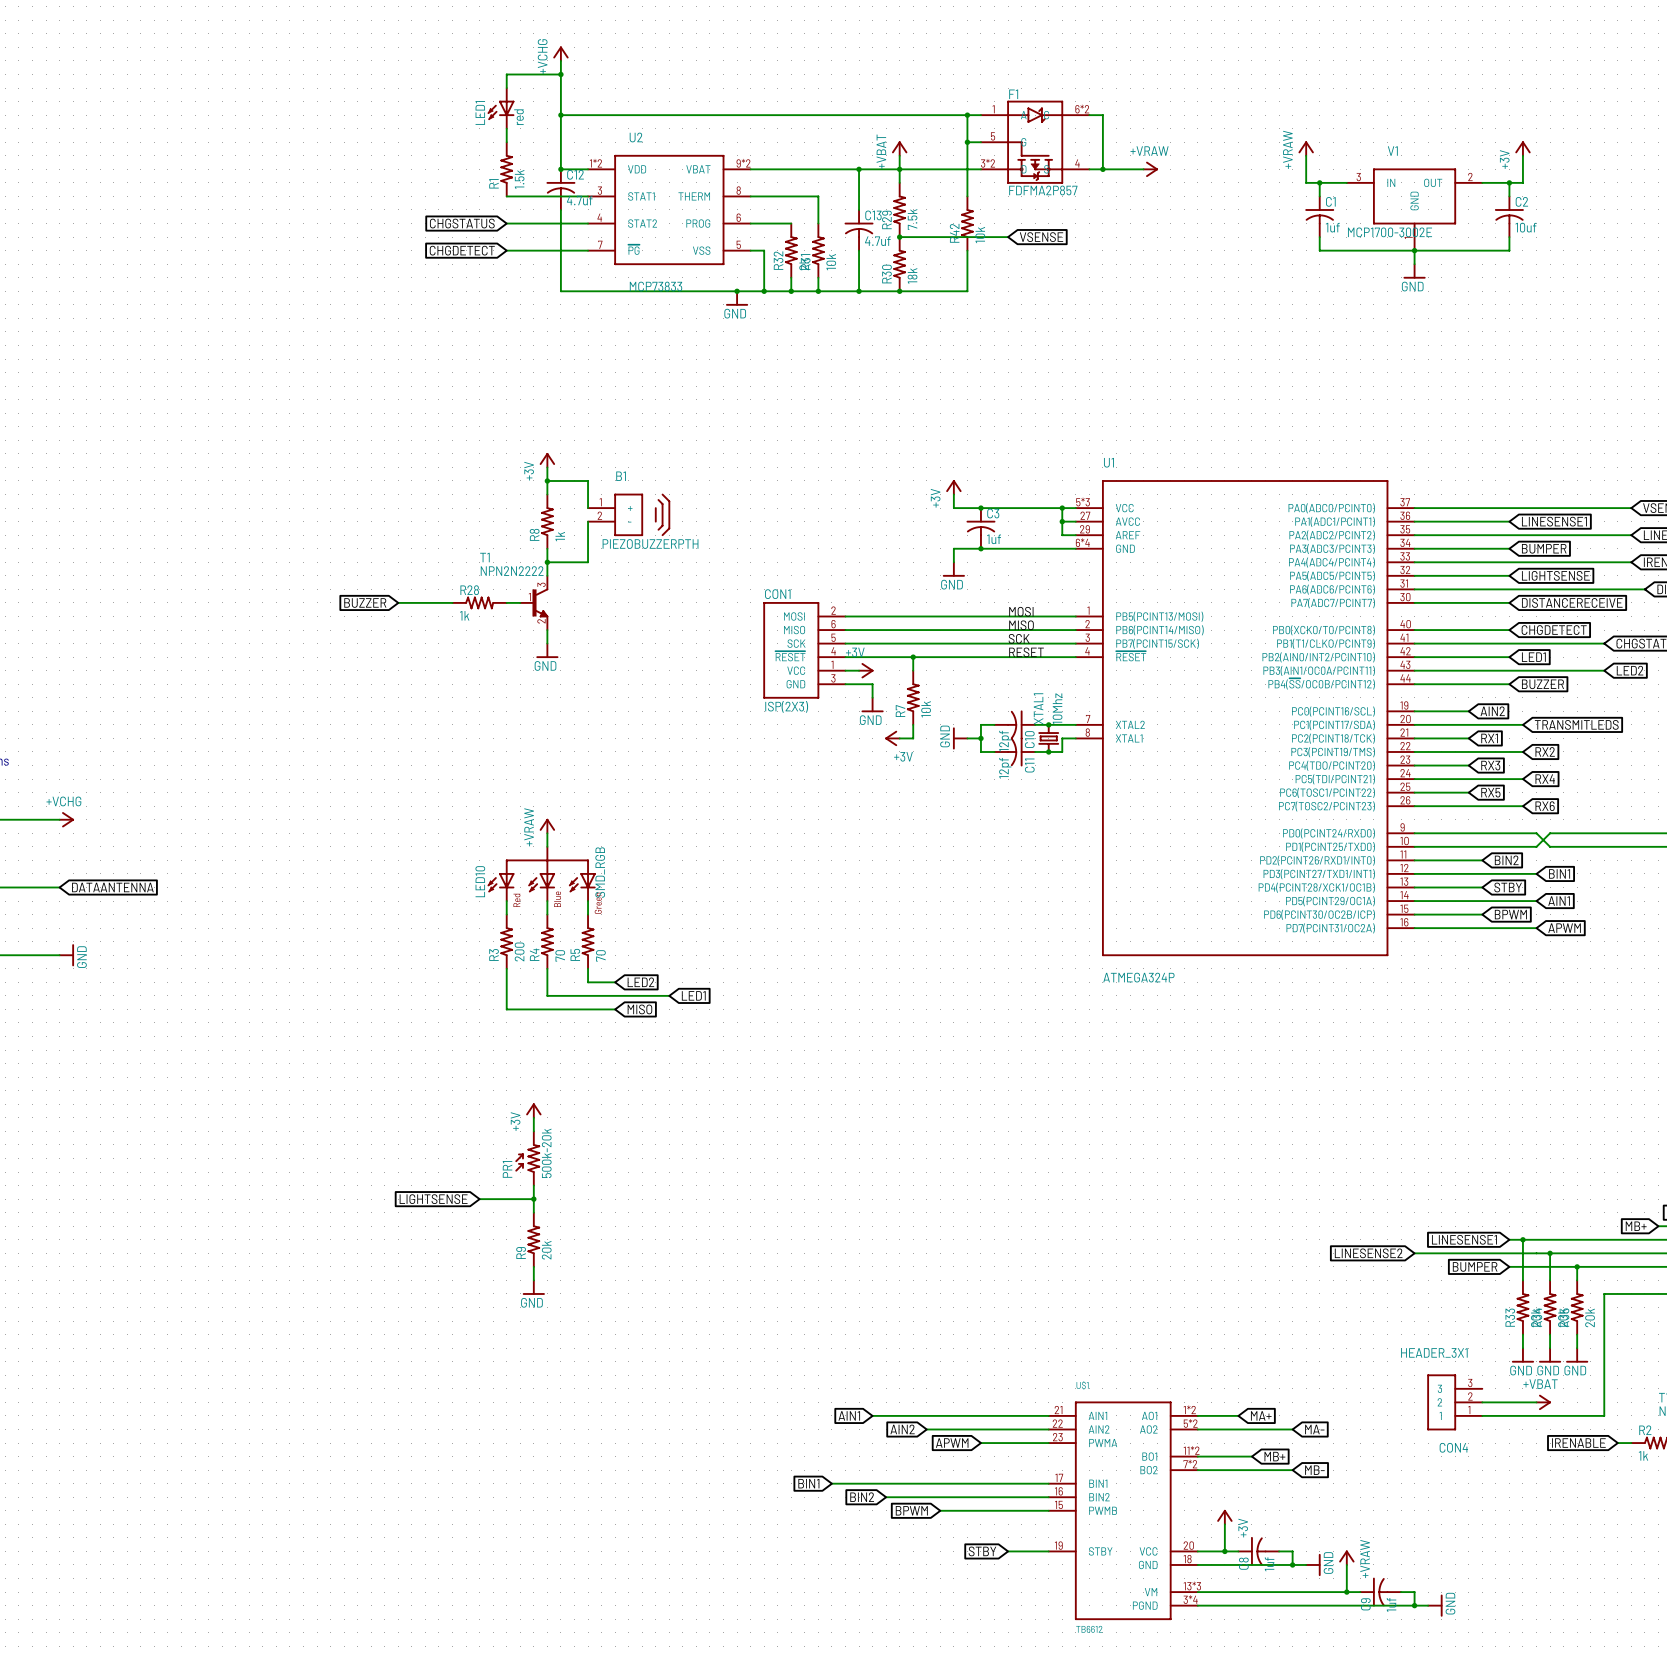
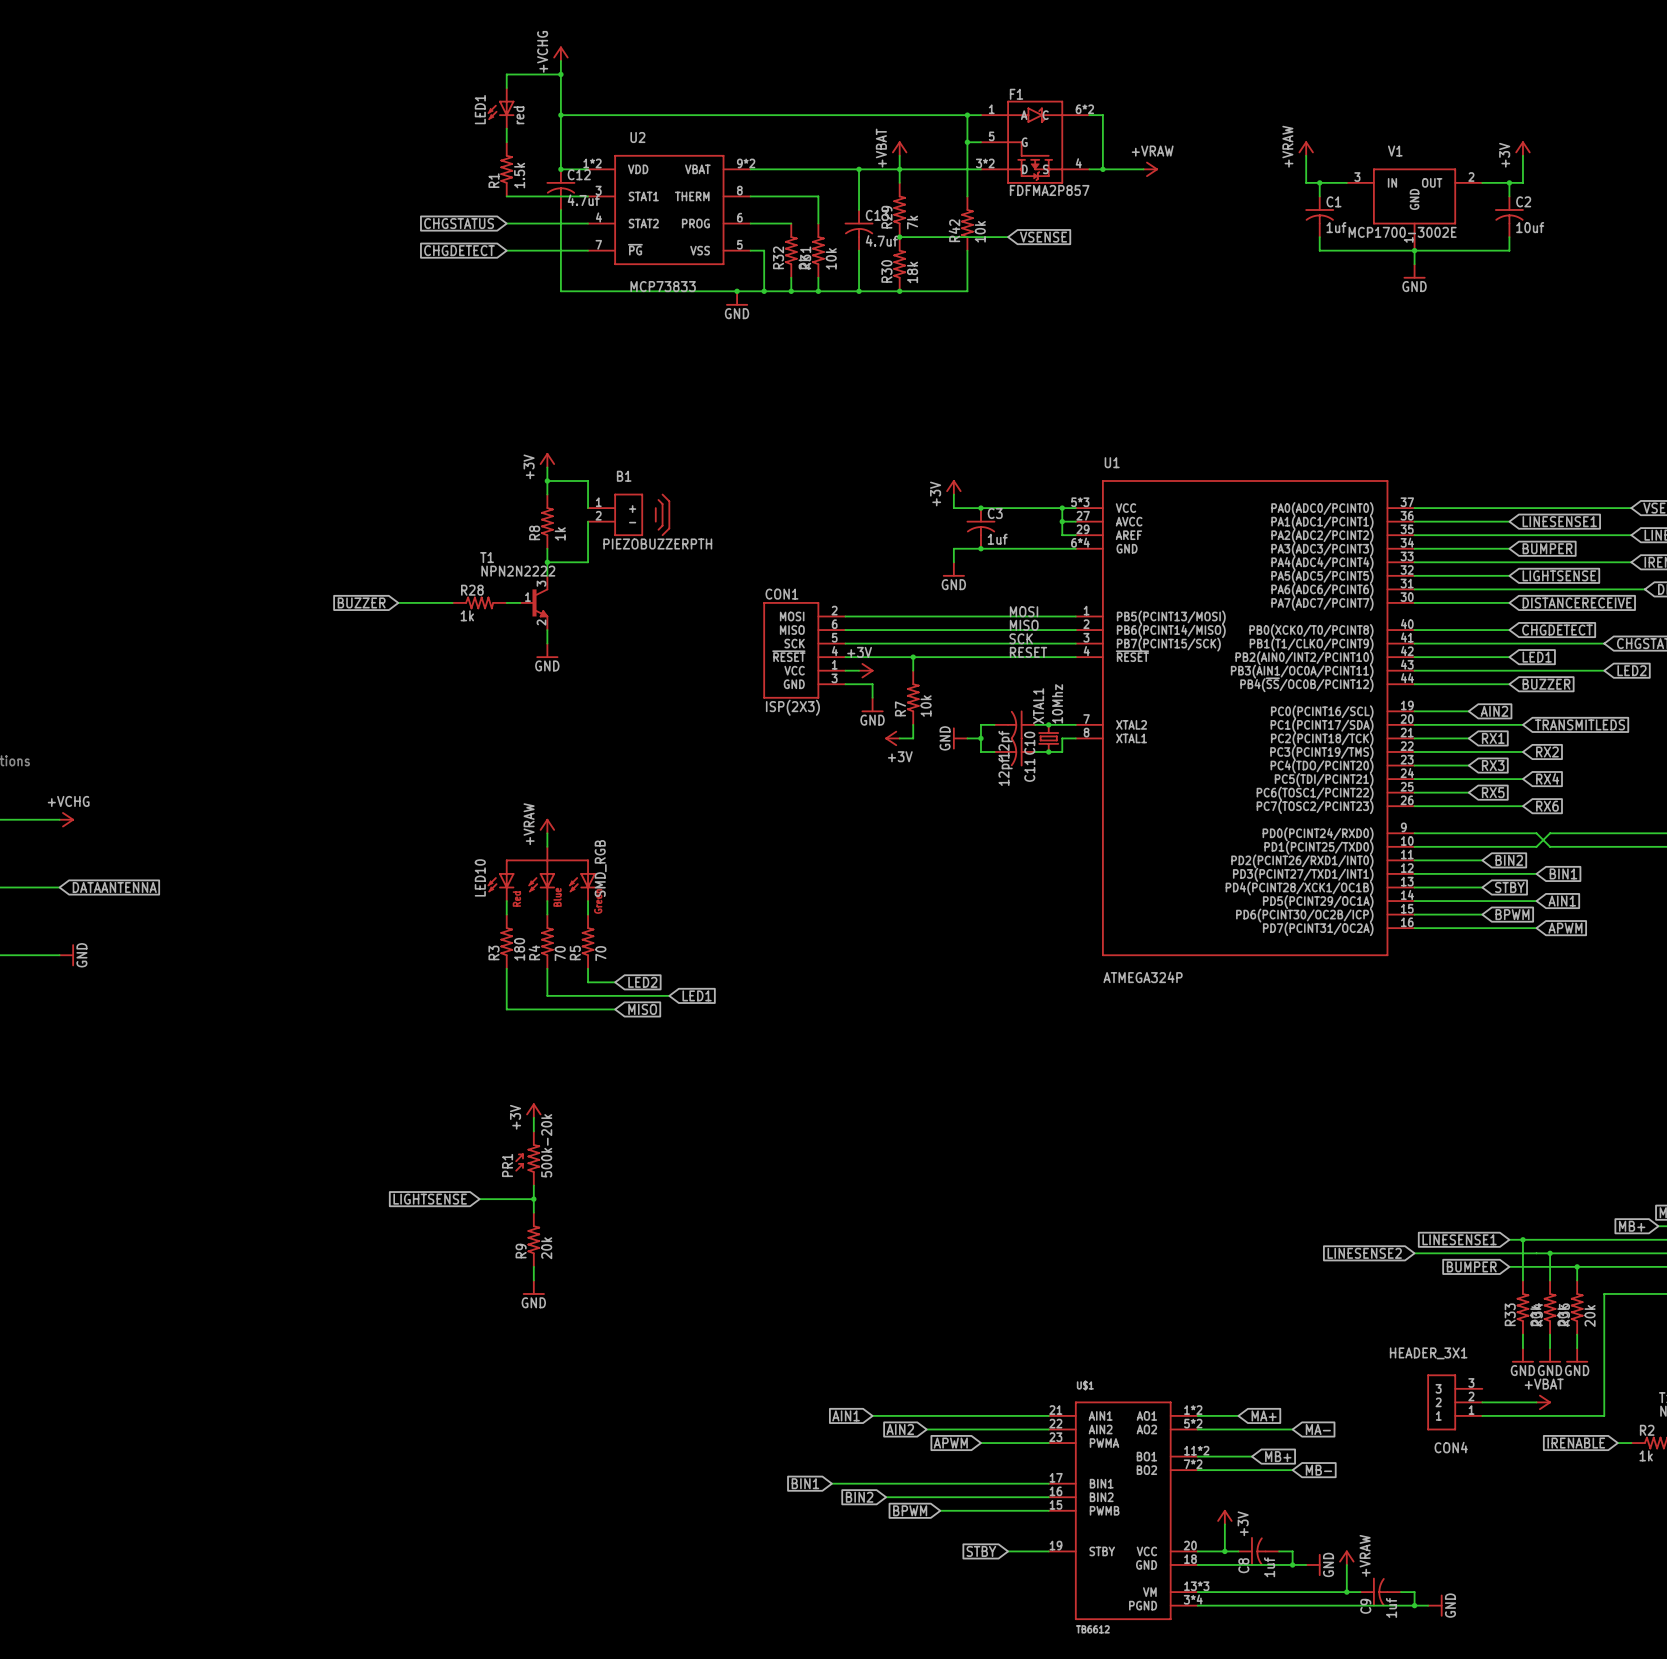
R29 value: 7.5k (912, 219) -> 7k (912, 222)
R3 value: 200 (519, 951) -> 180 (519, 949)

